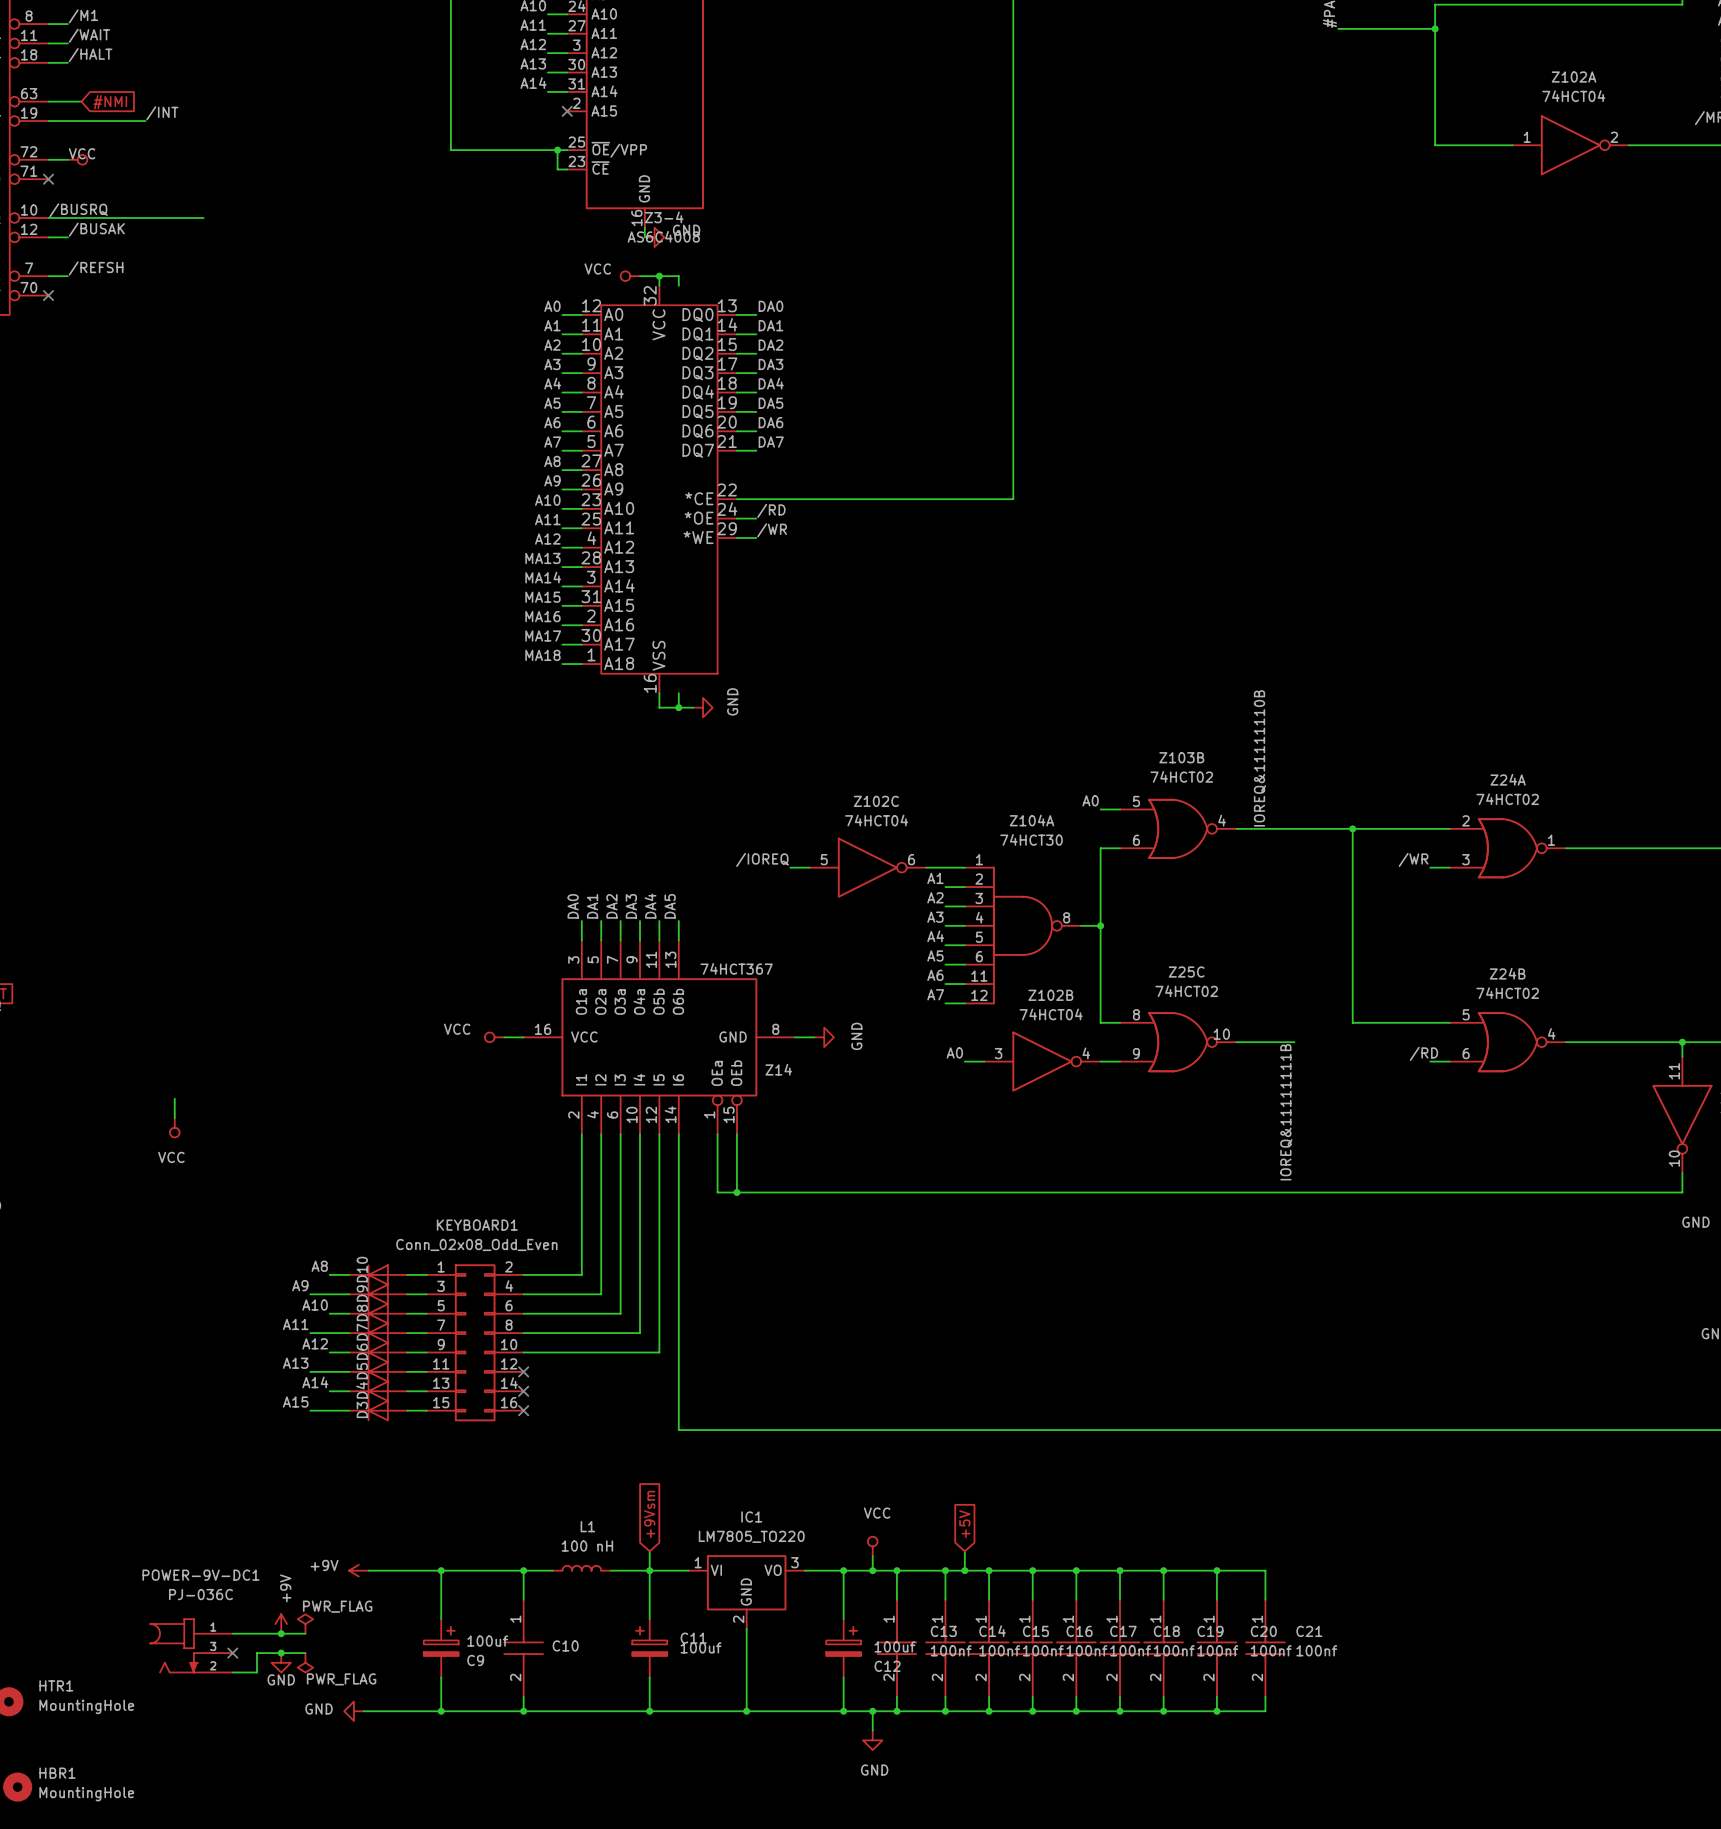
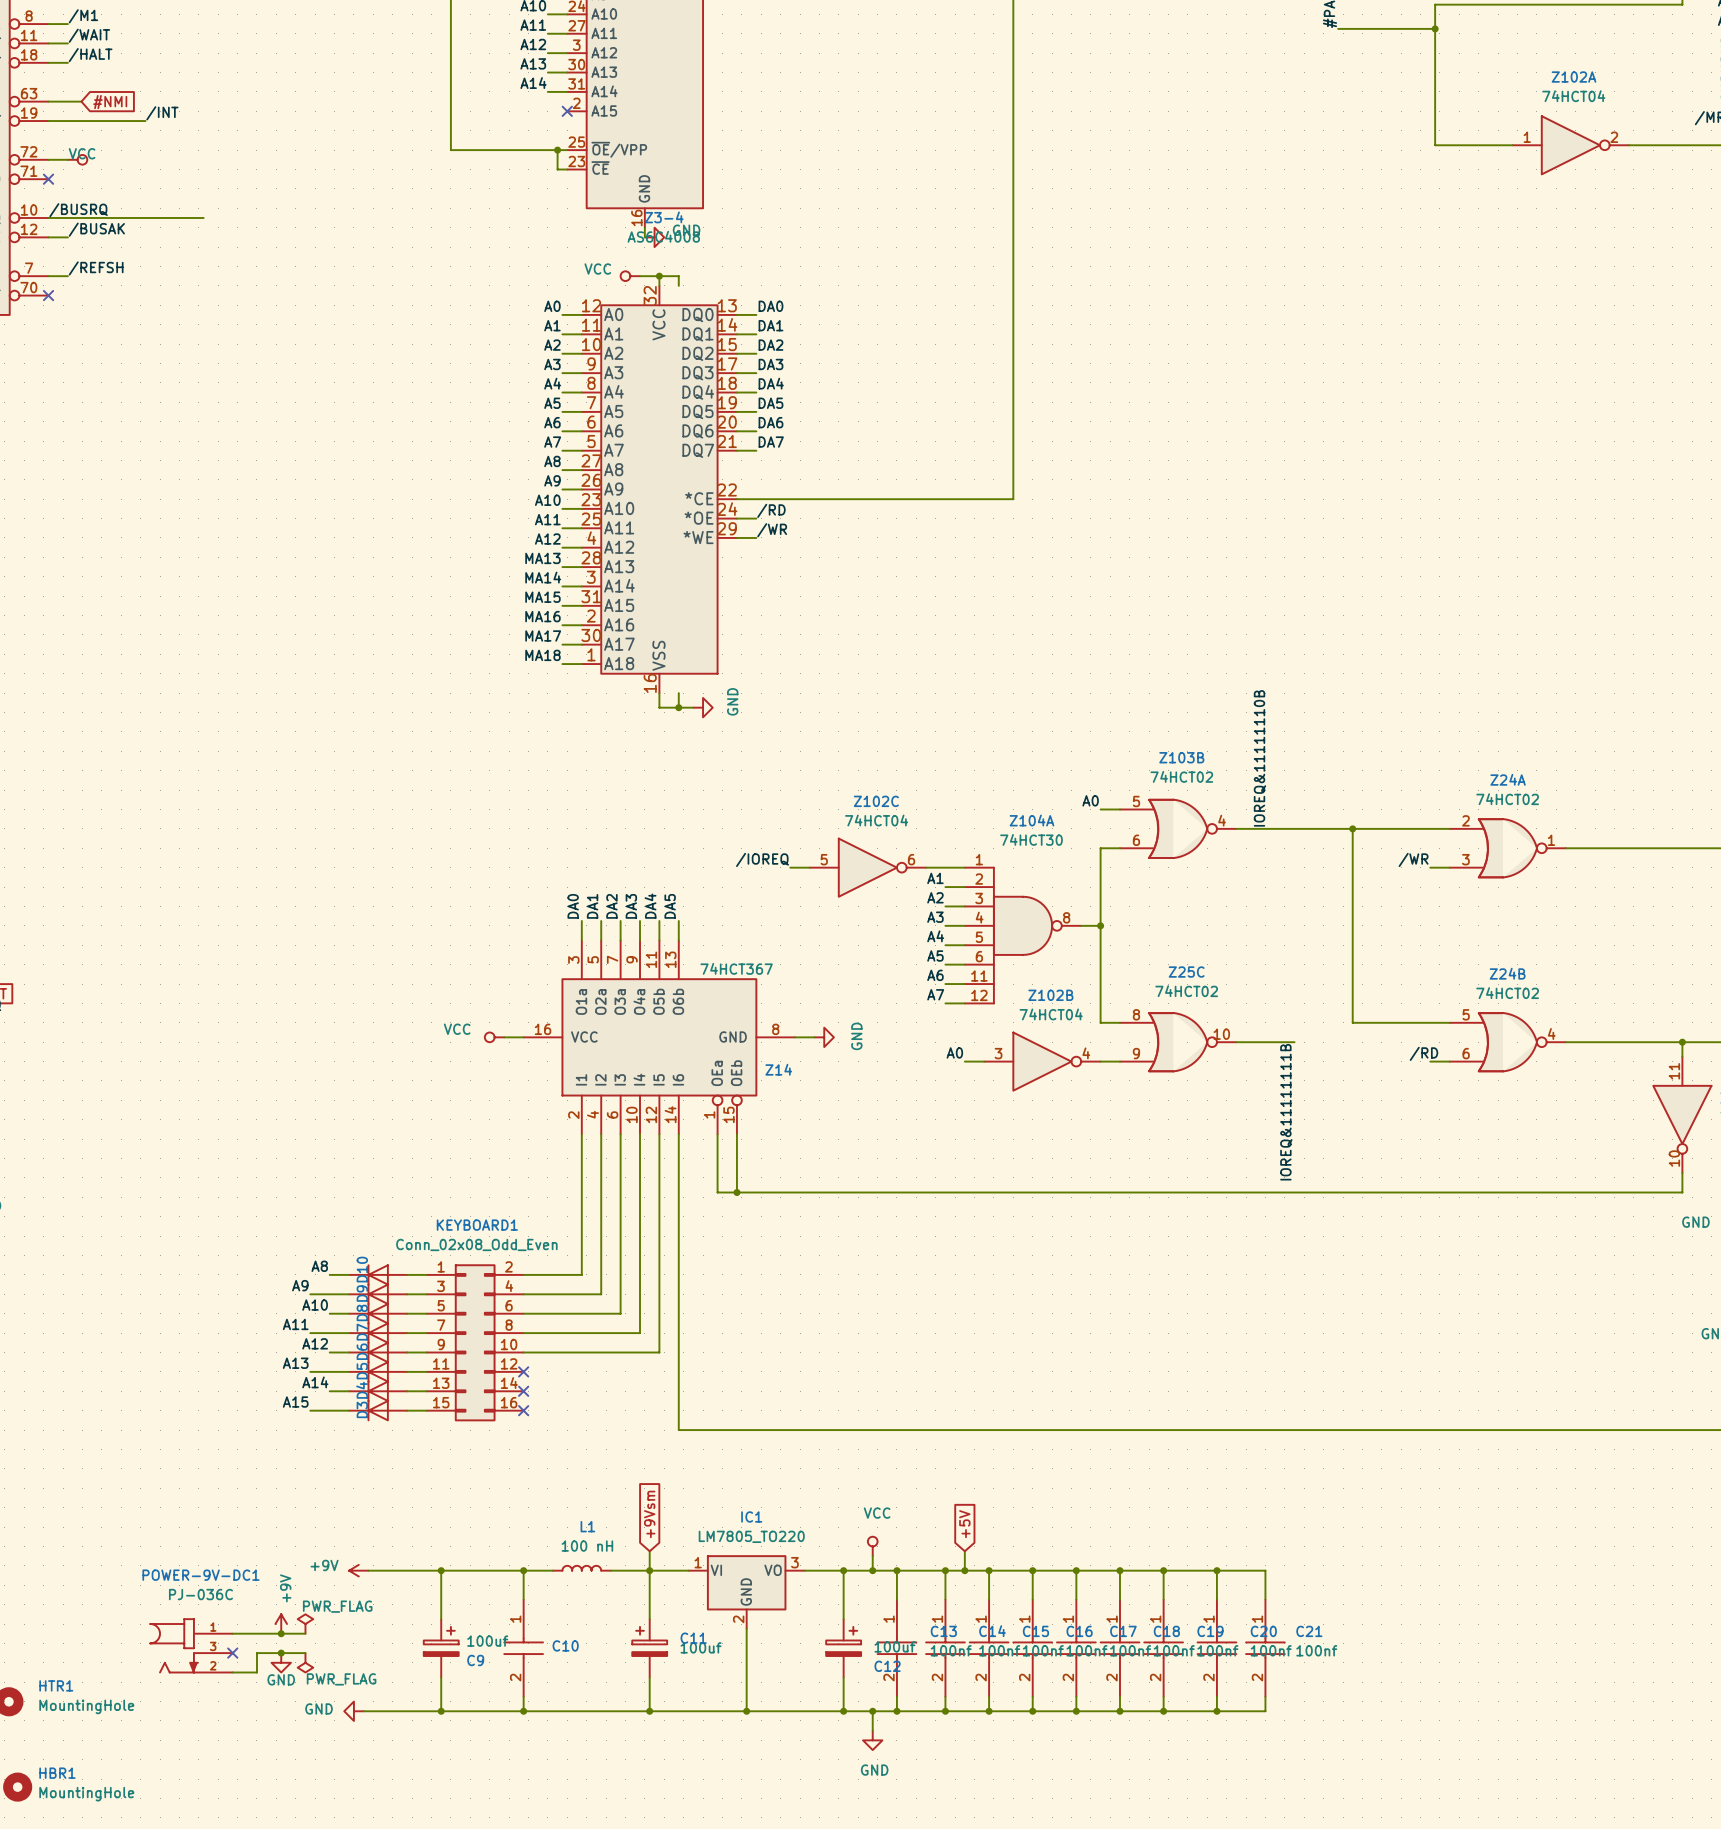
wire: (174, 1098) (174, 1118) -> none
power symbol: VCC (174, 1127) -> none

